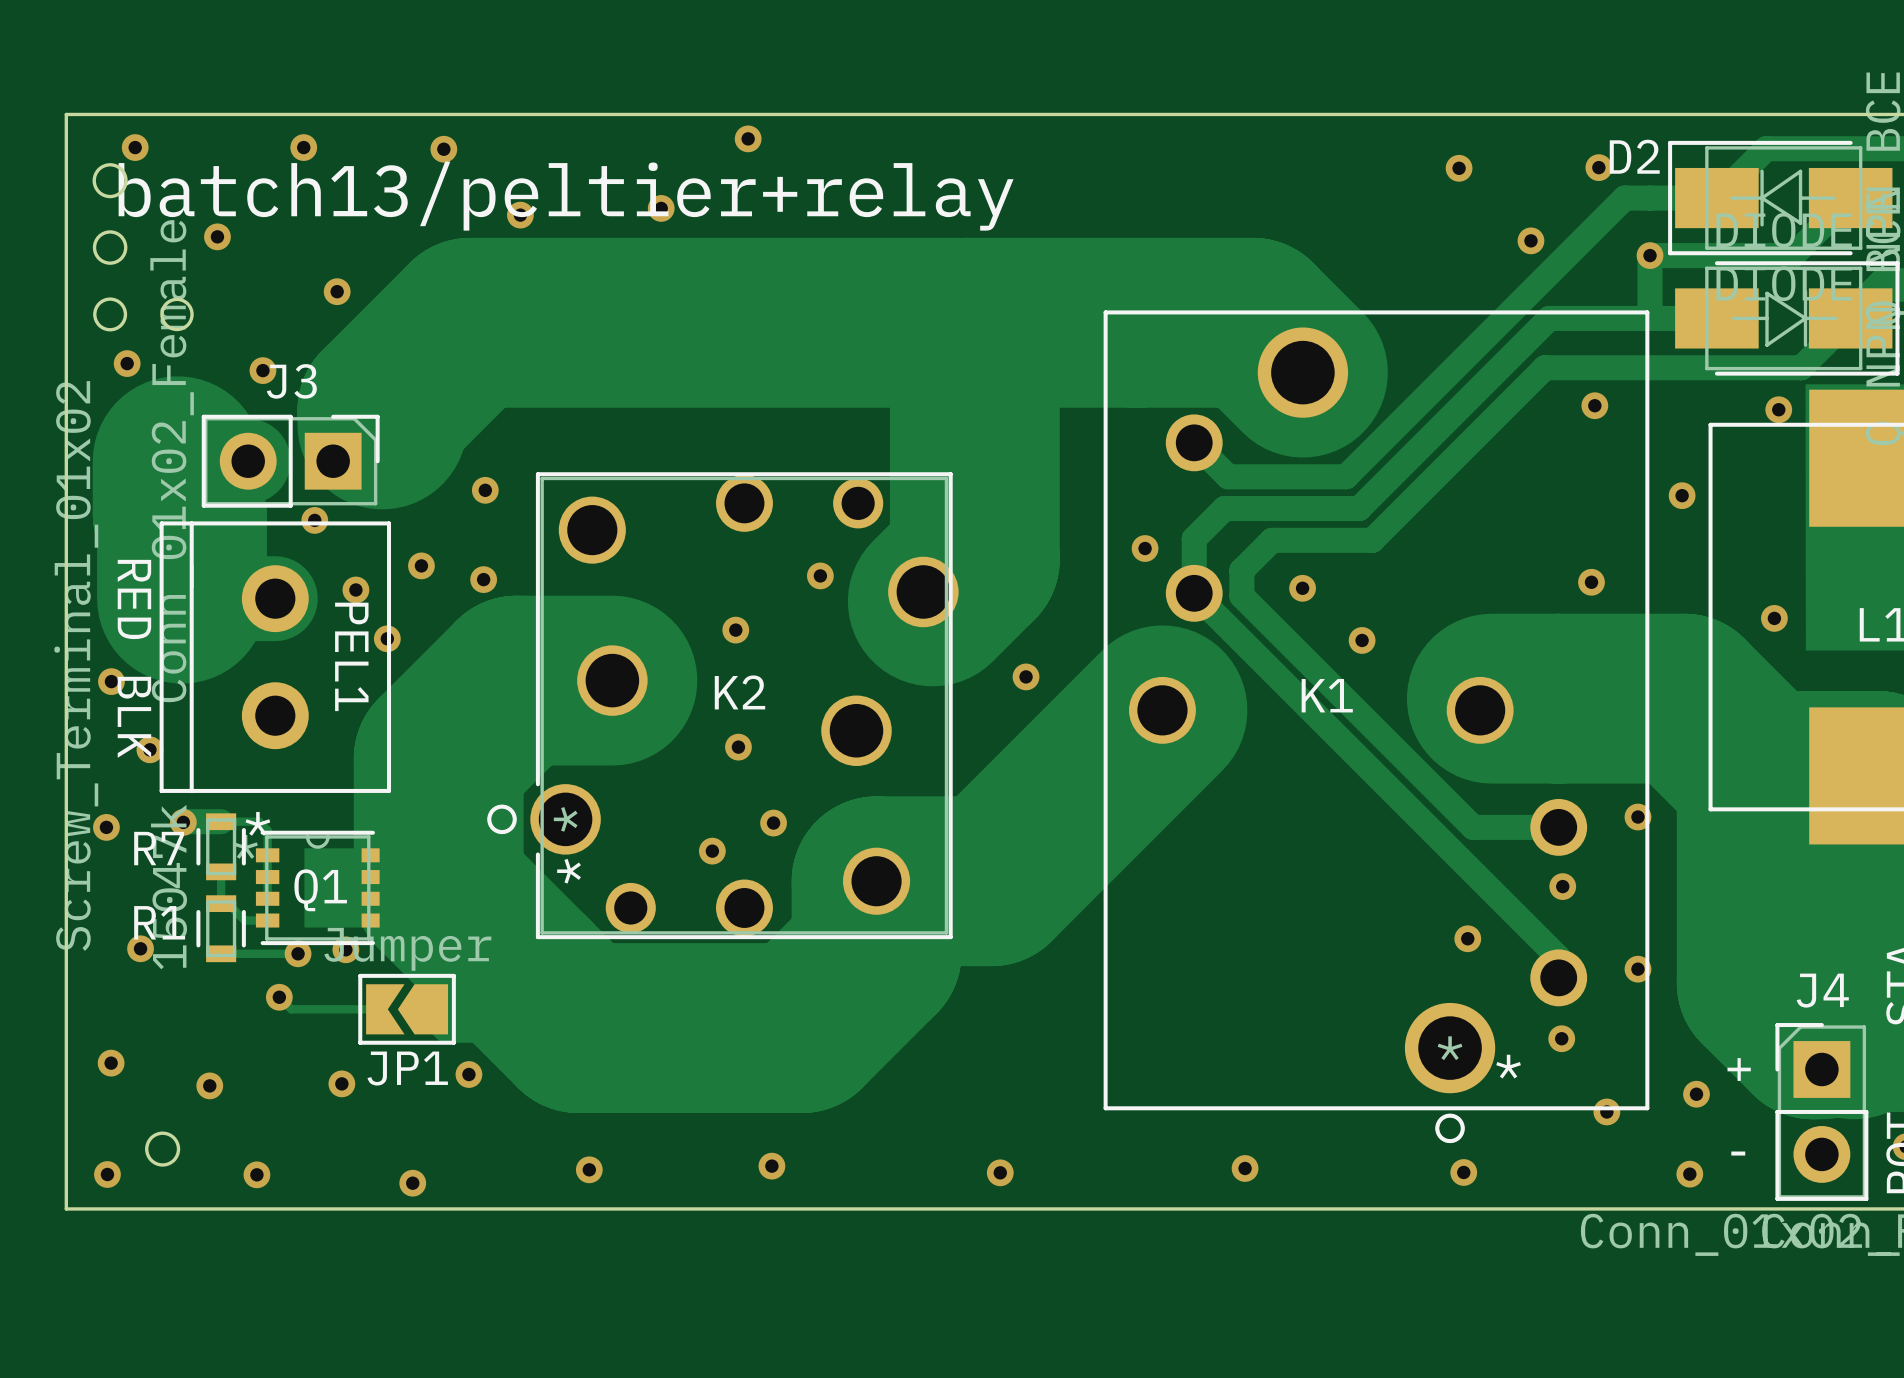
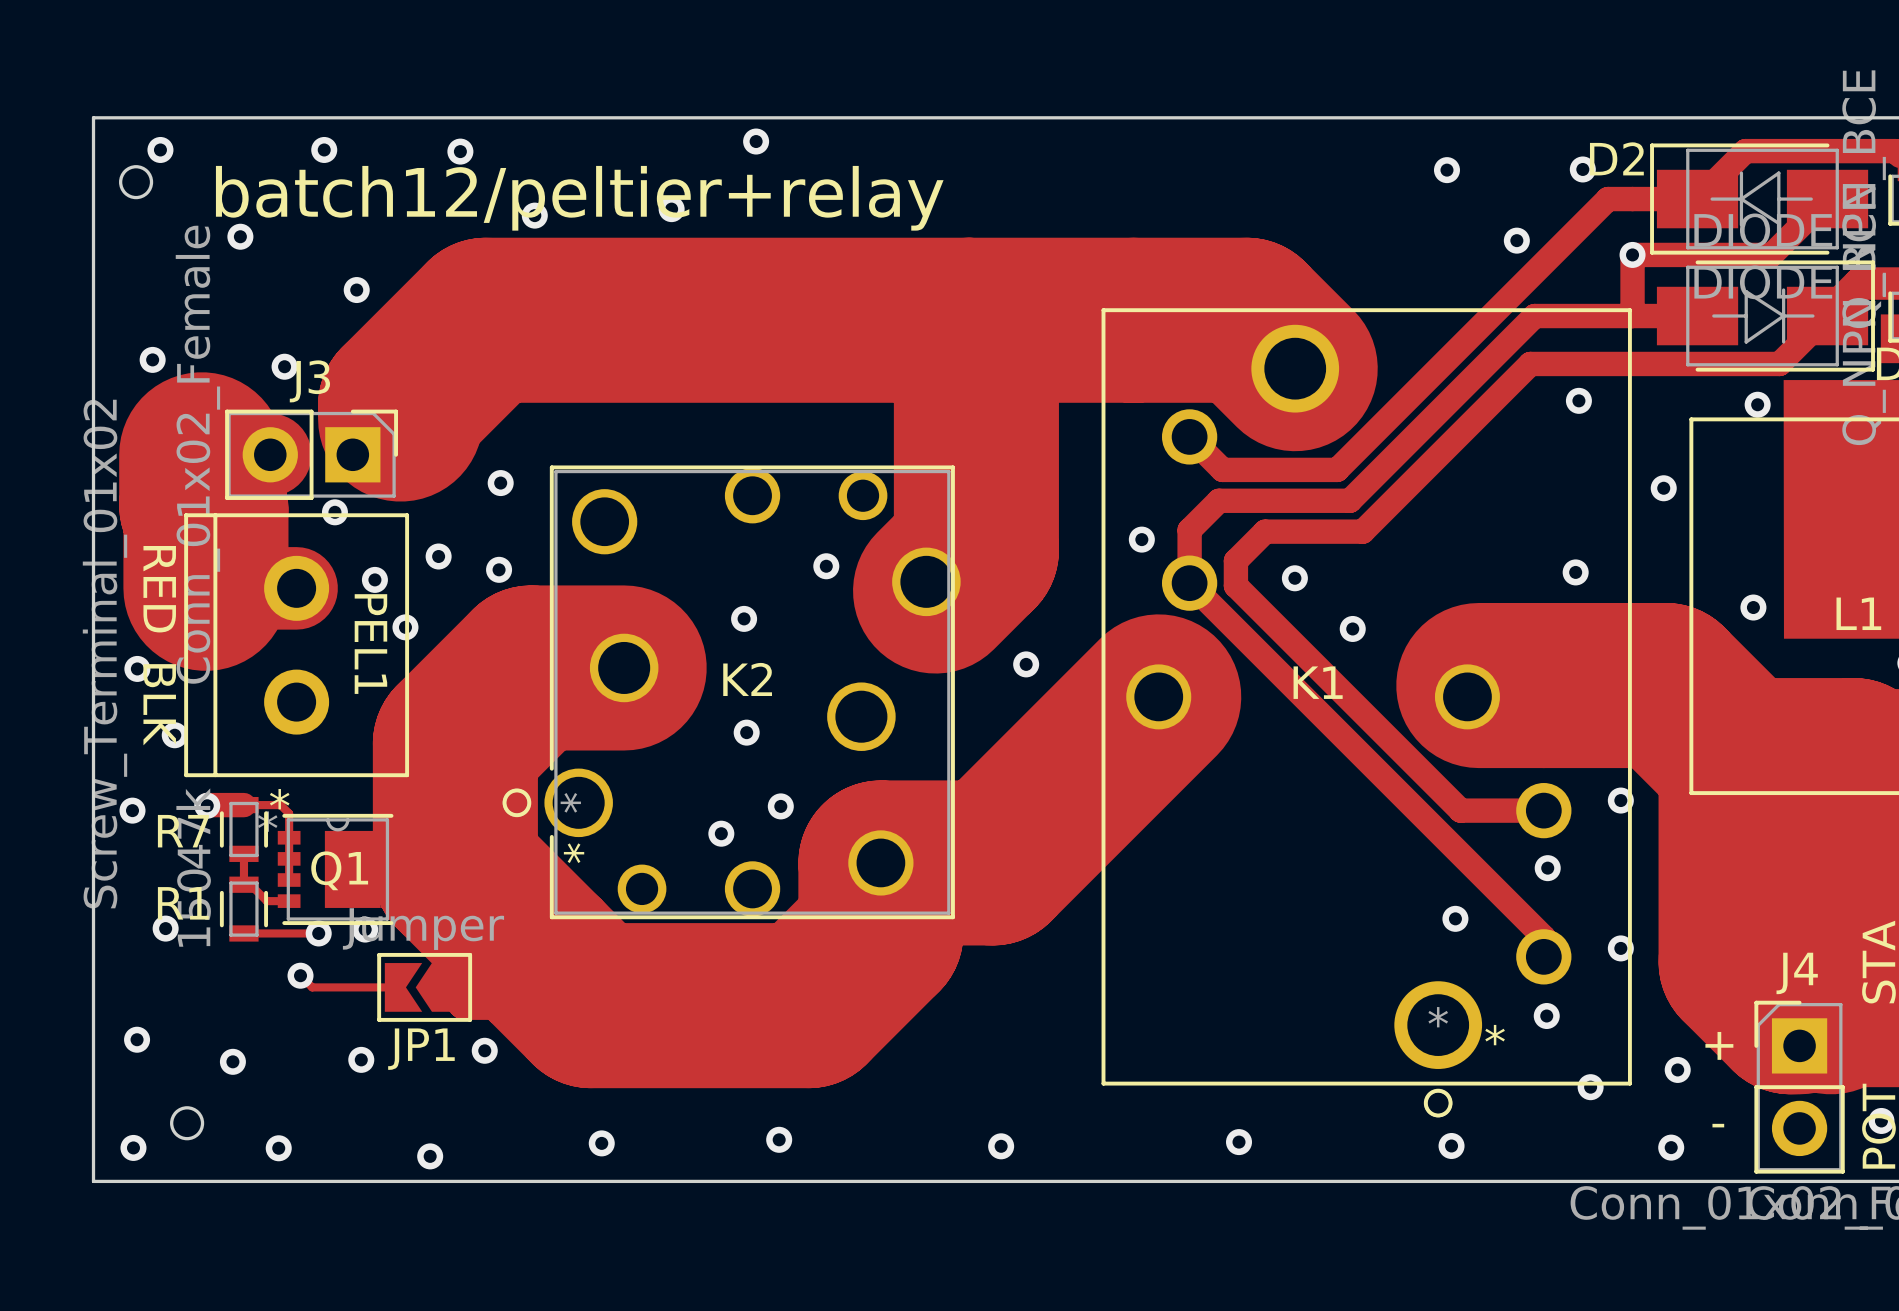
text: batch13/peltier+relay (566, 196) -> batch12/peltier+relay (579, 198)
round board edge: [92, 230, 128, 265] -> none
round board edge: [93, 297, 128, 332] -> none
round board edge: [160, 297, 194, 332] -> none

